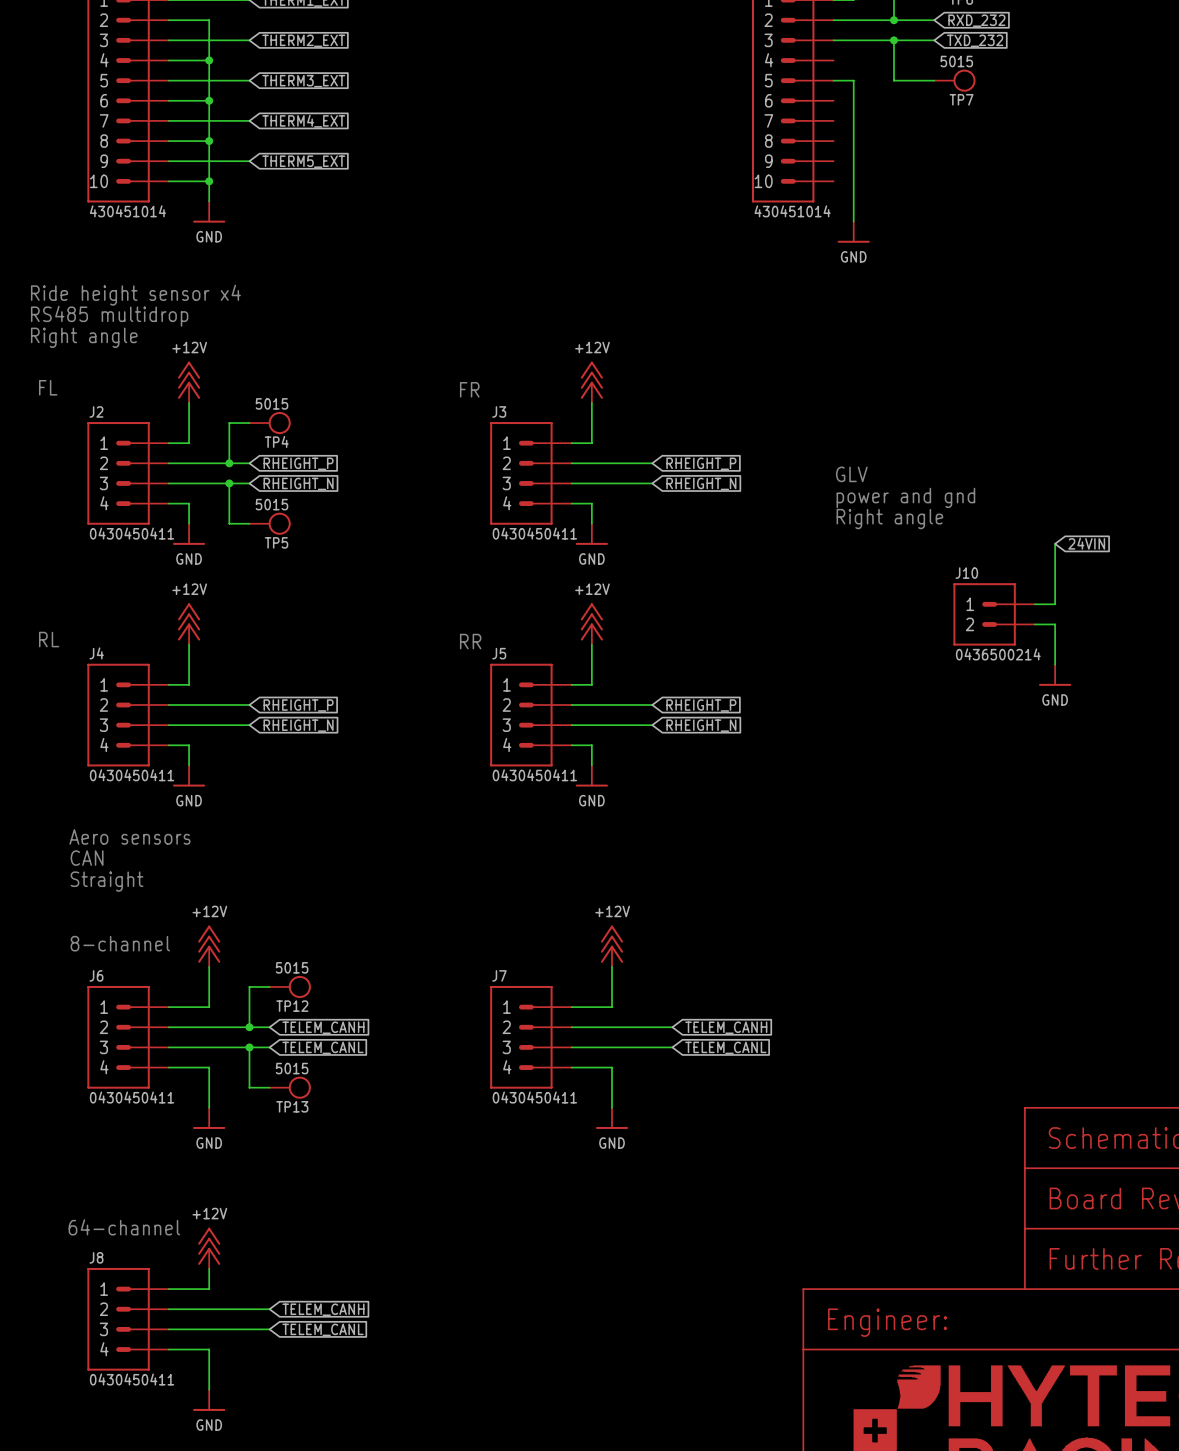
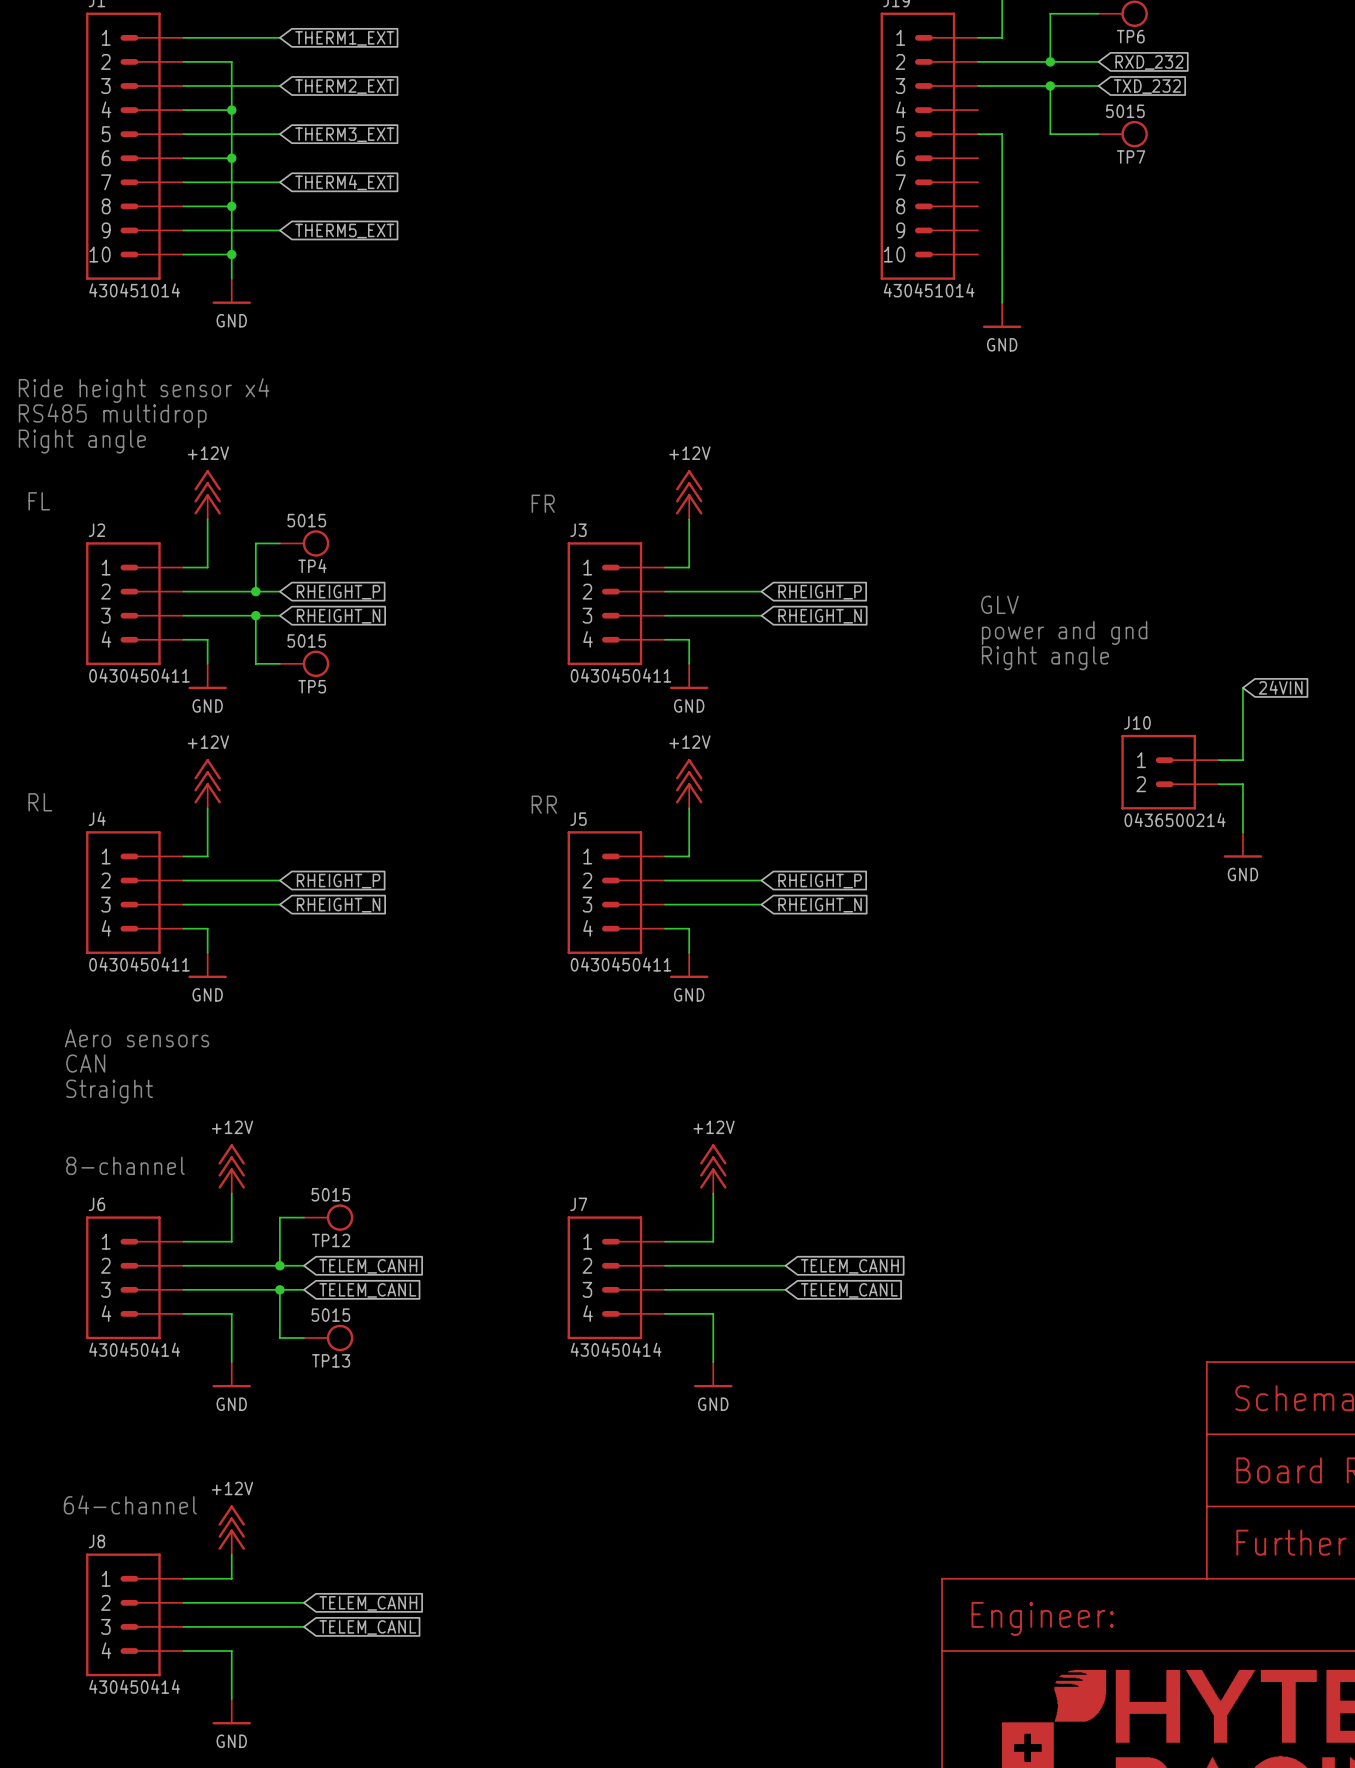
J6 text: 0430450411 (132, 1097) -> 430450414 (134, 1349)
J7 text: 0430450411 (534, 1097) -> 430450414 (616, 1349)
J8 text: 0430450411 (132, 1379) -> 430450414 (134, 1686)

